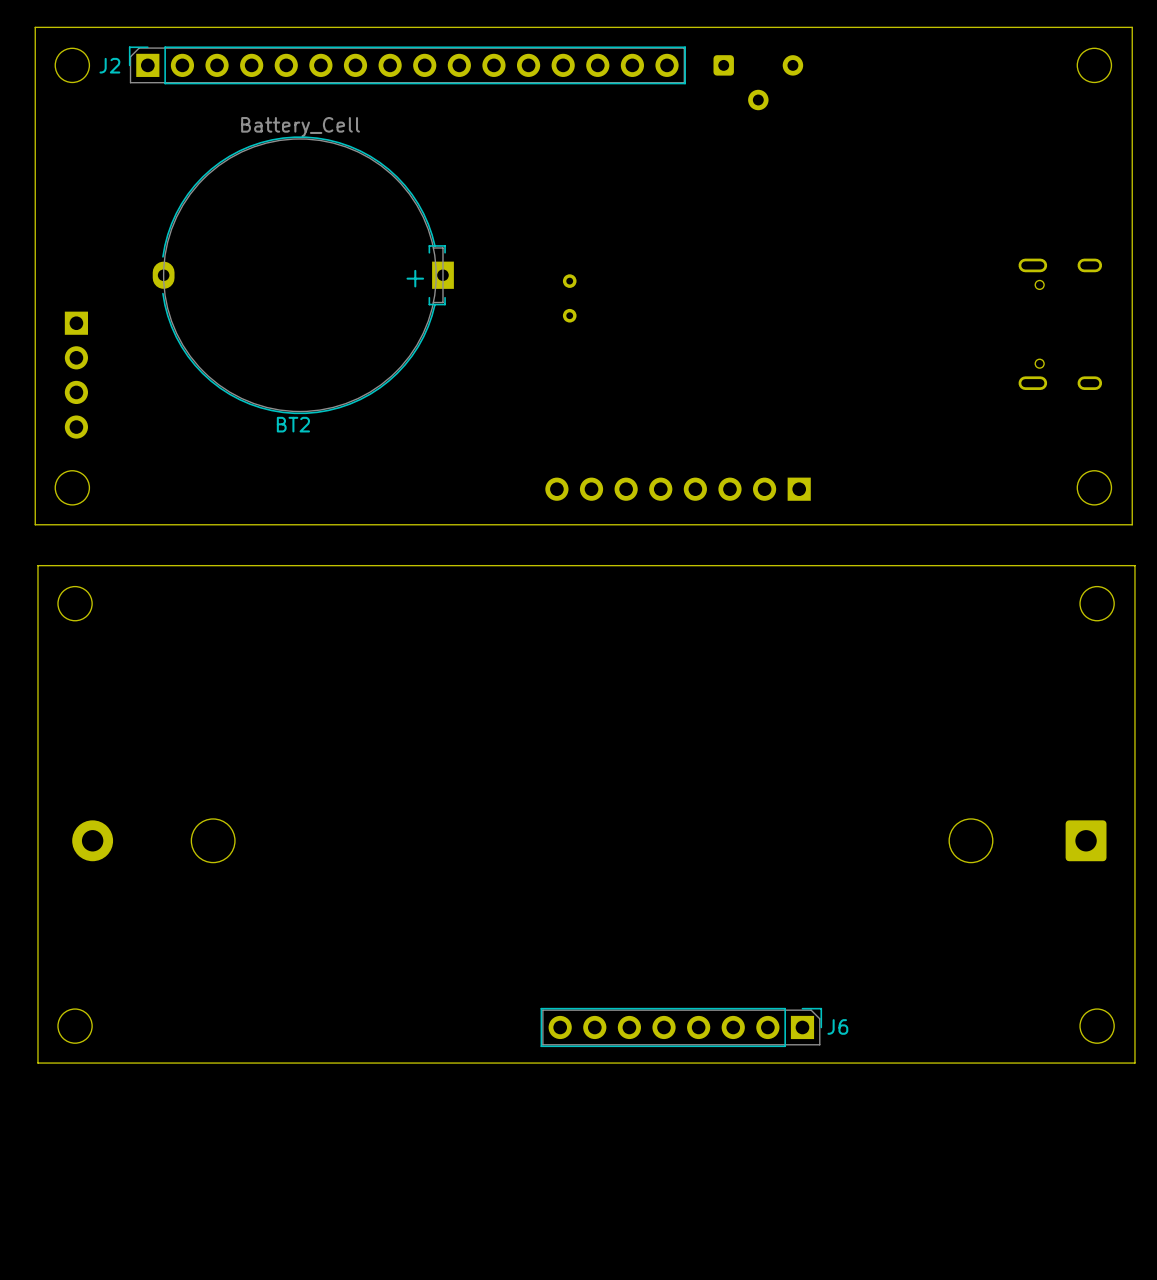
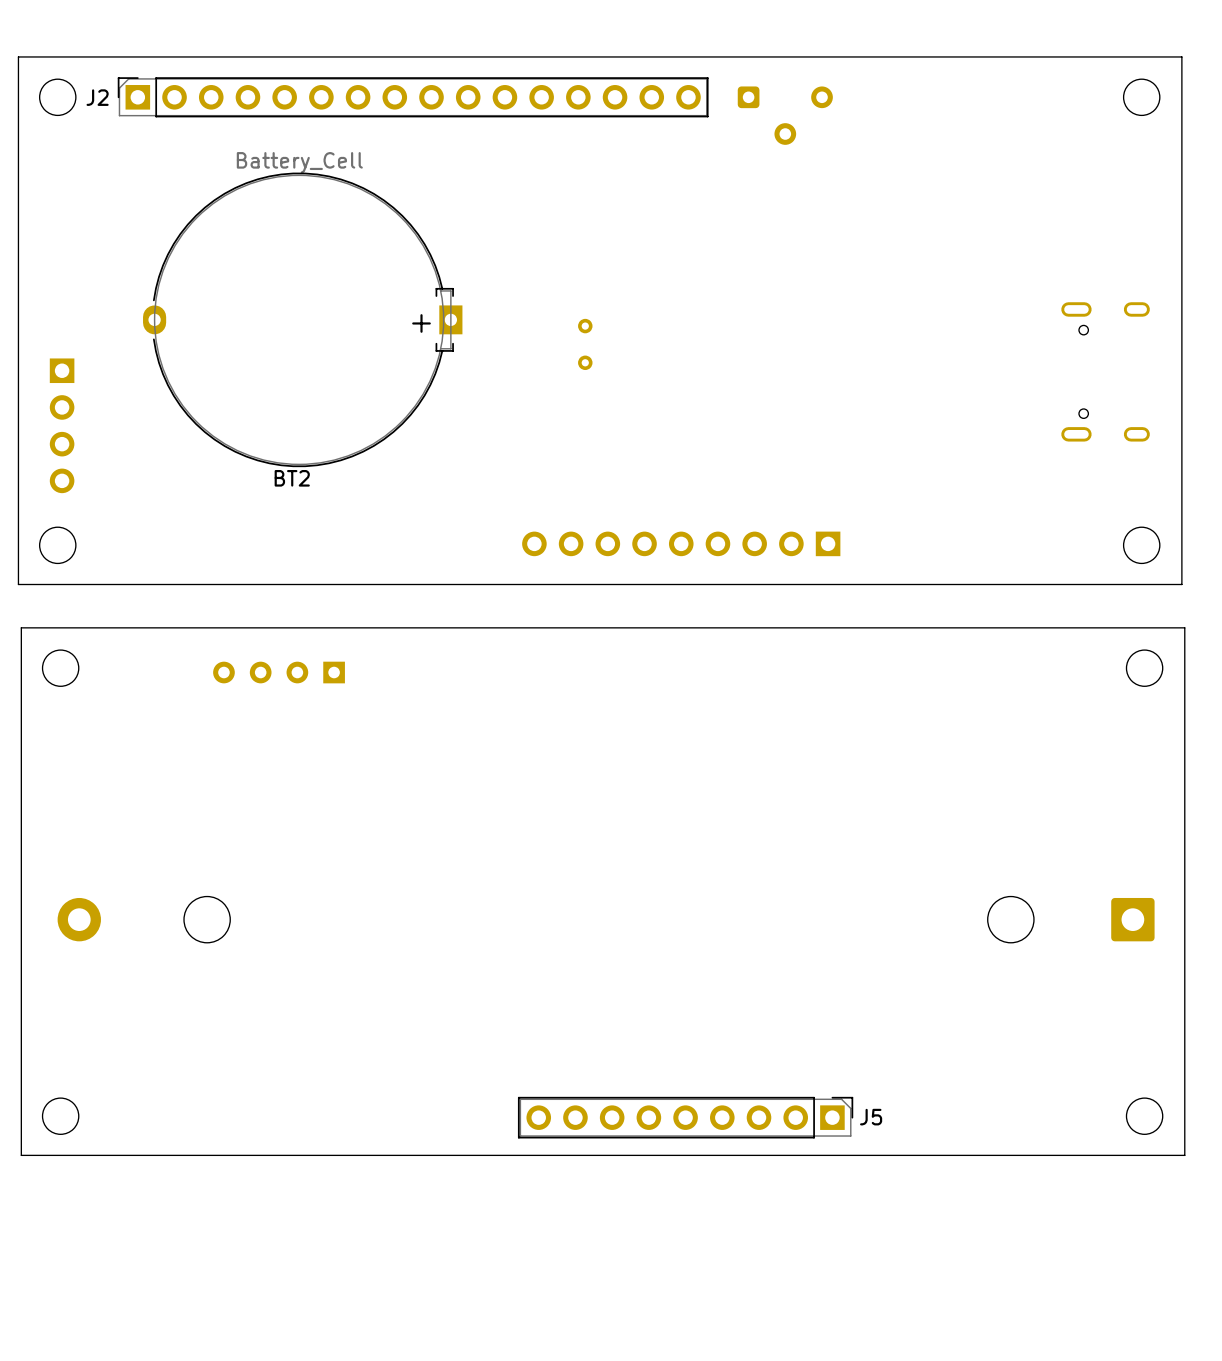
part: none -> (681, 543)
part: (678, 489) -> none
part: none -> (279, 672)
J5: none -> (685, 1117)
J6: (681, 1027) -> none

